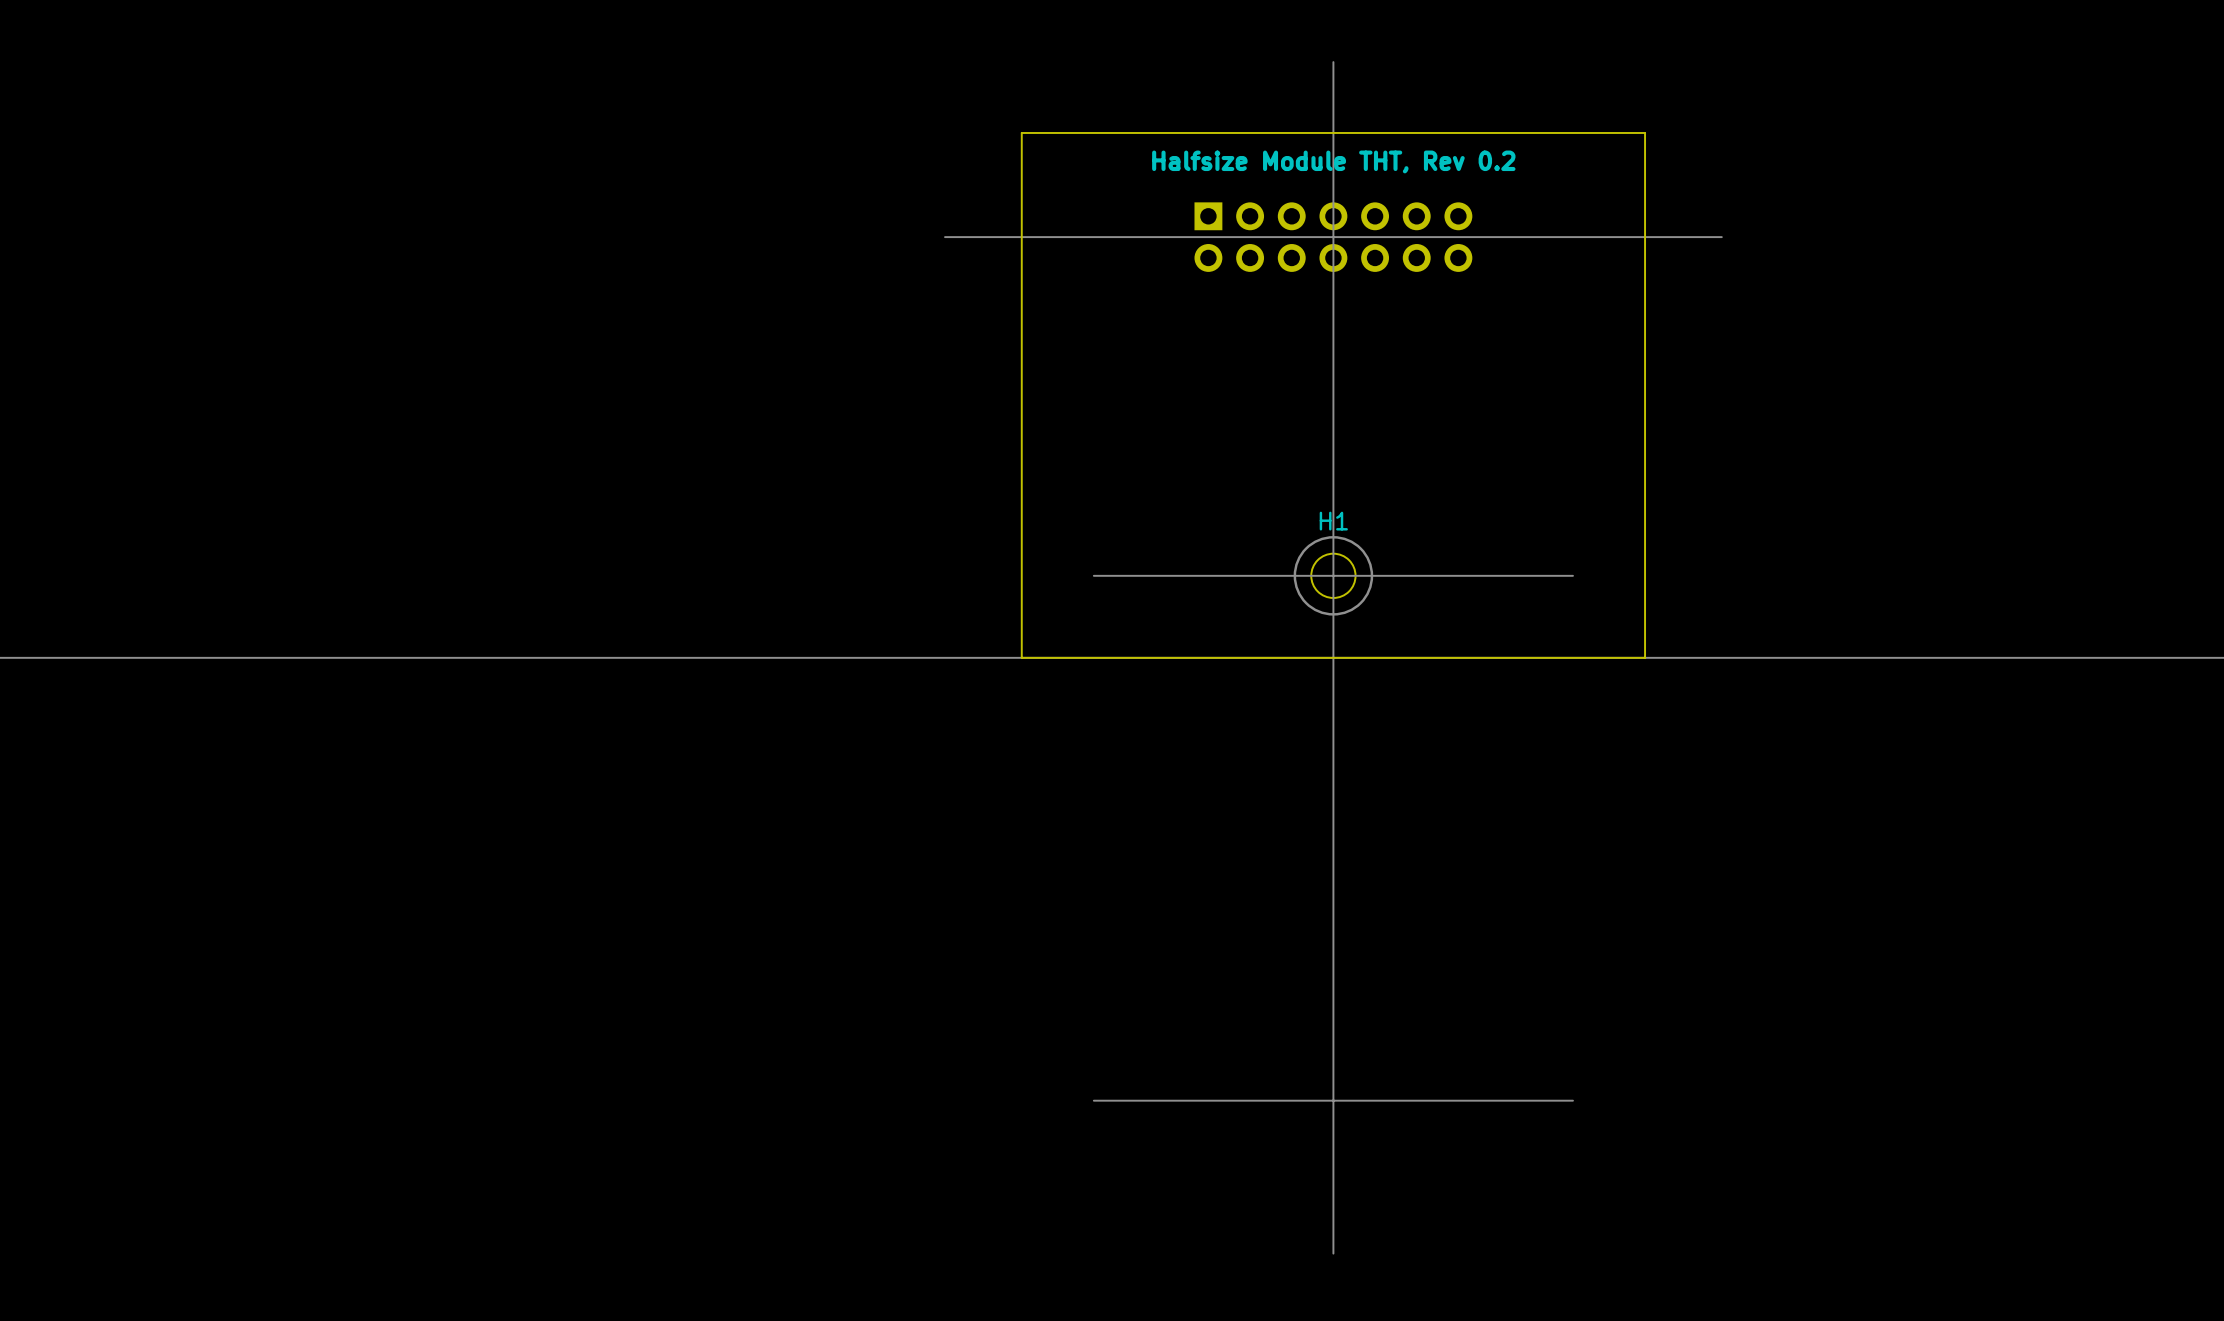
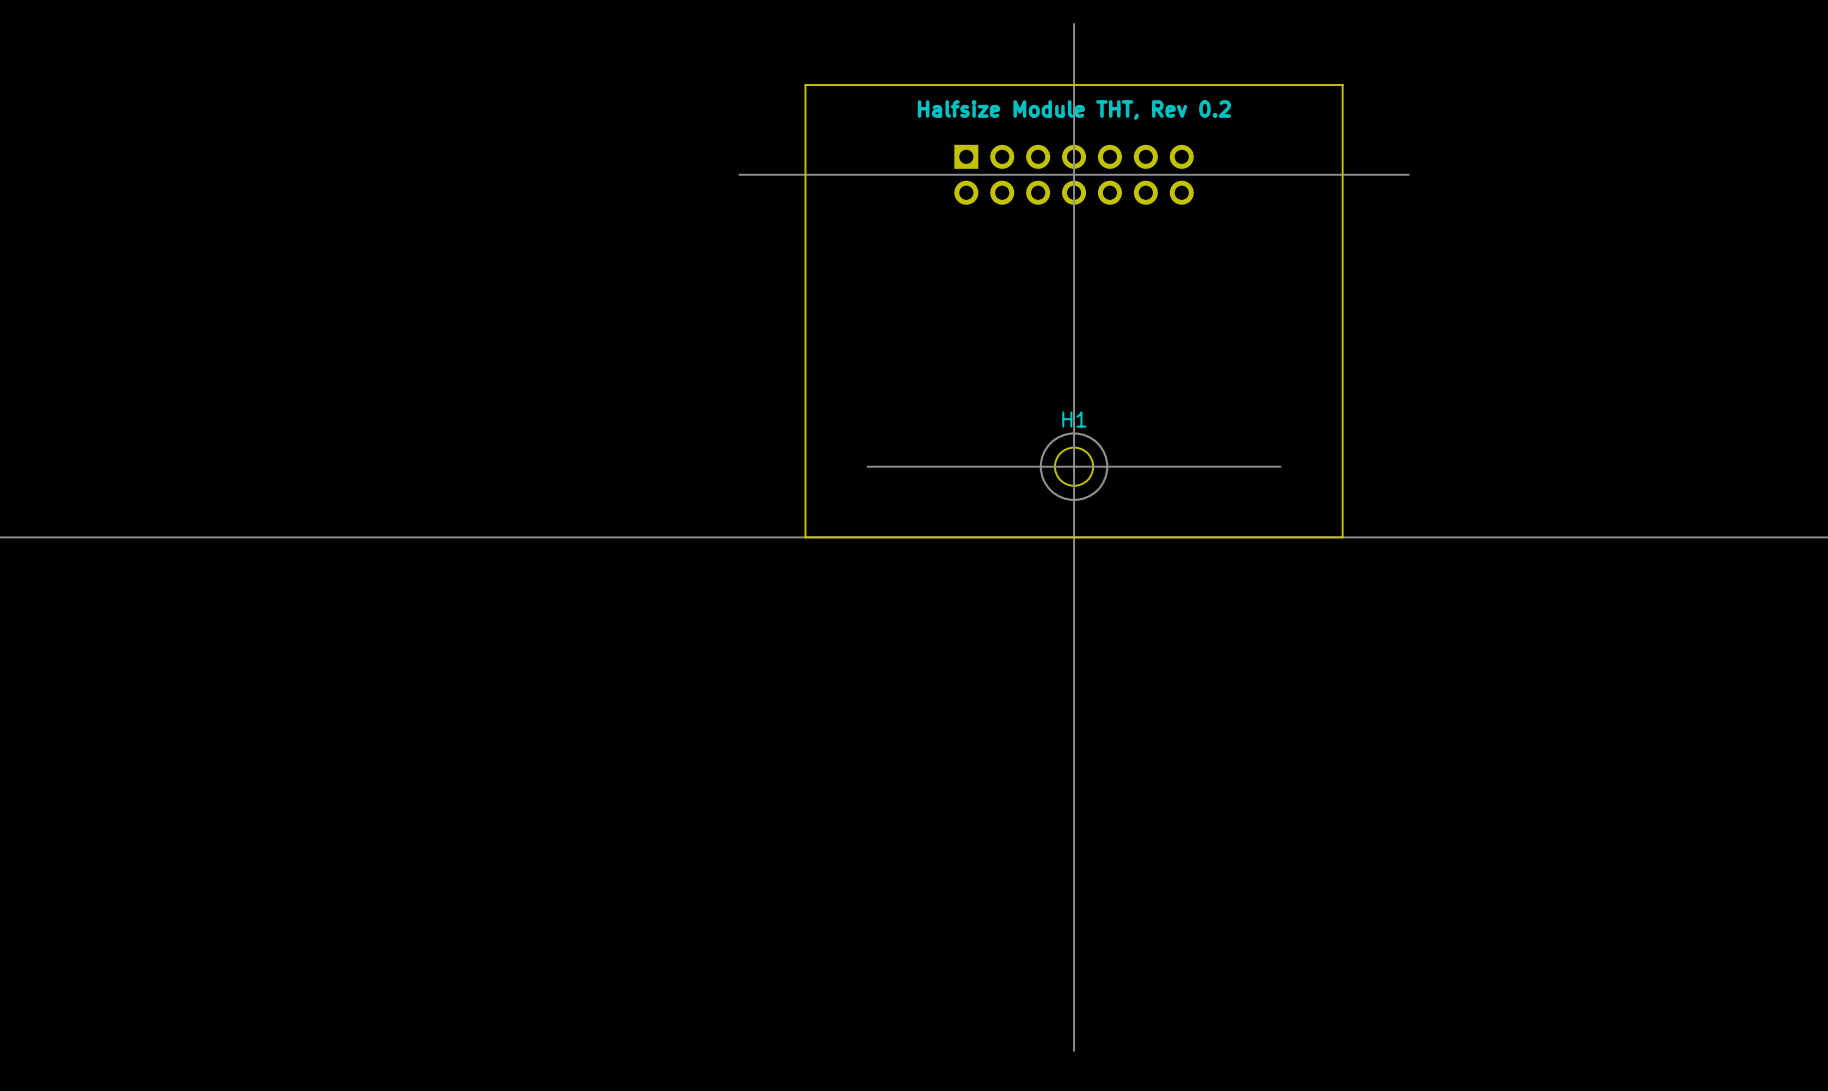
line: (1093, 1100) (1572, 1100) -> none

